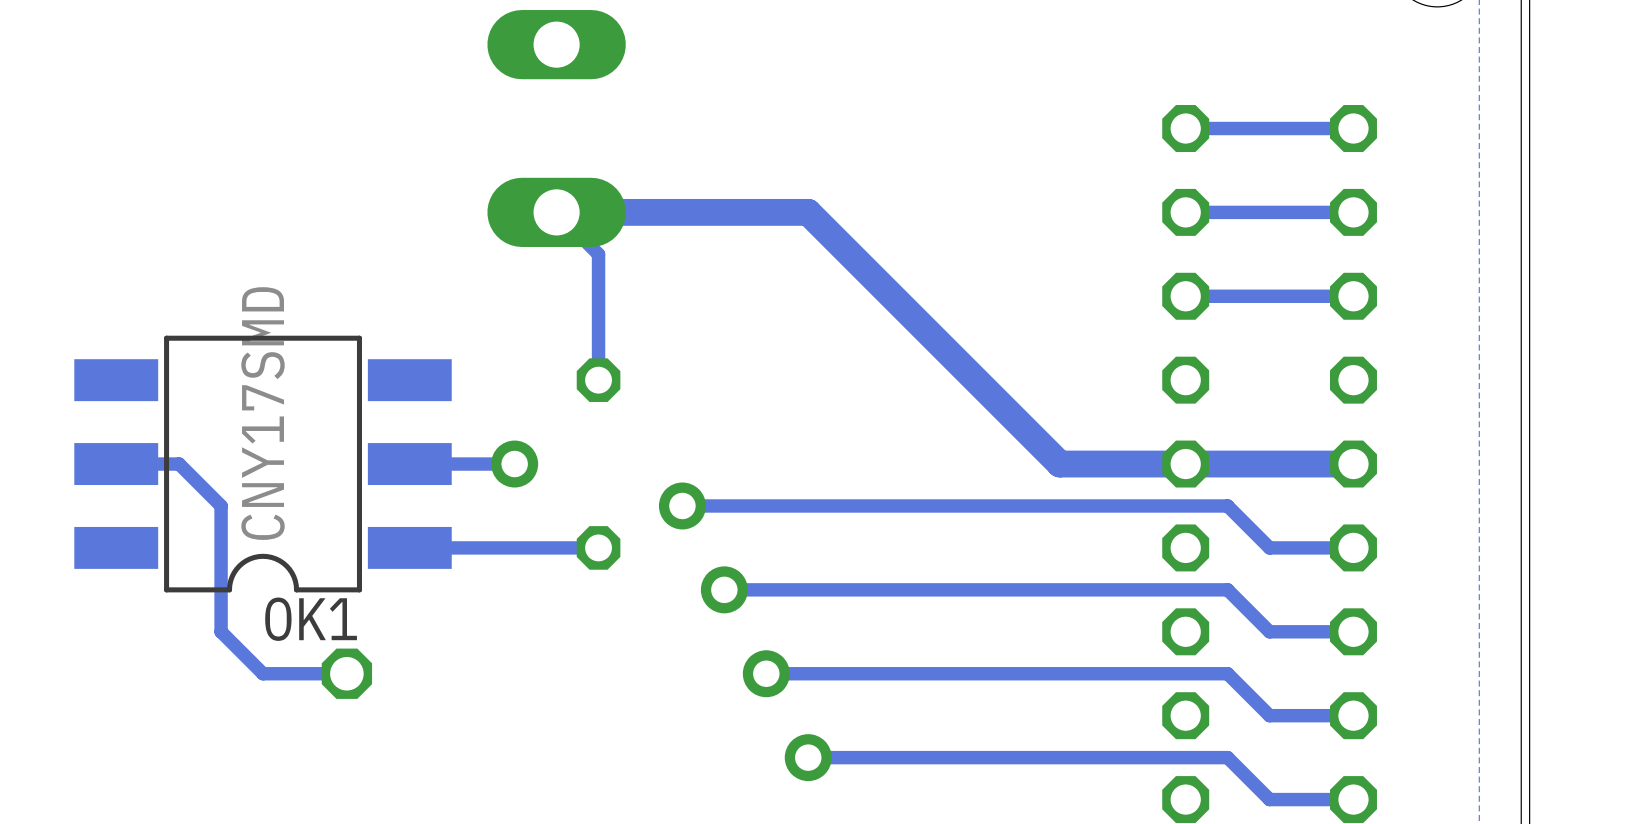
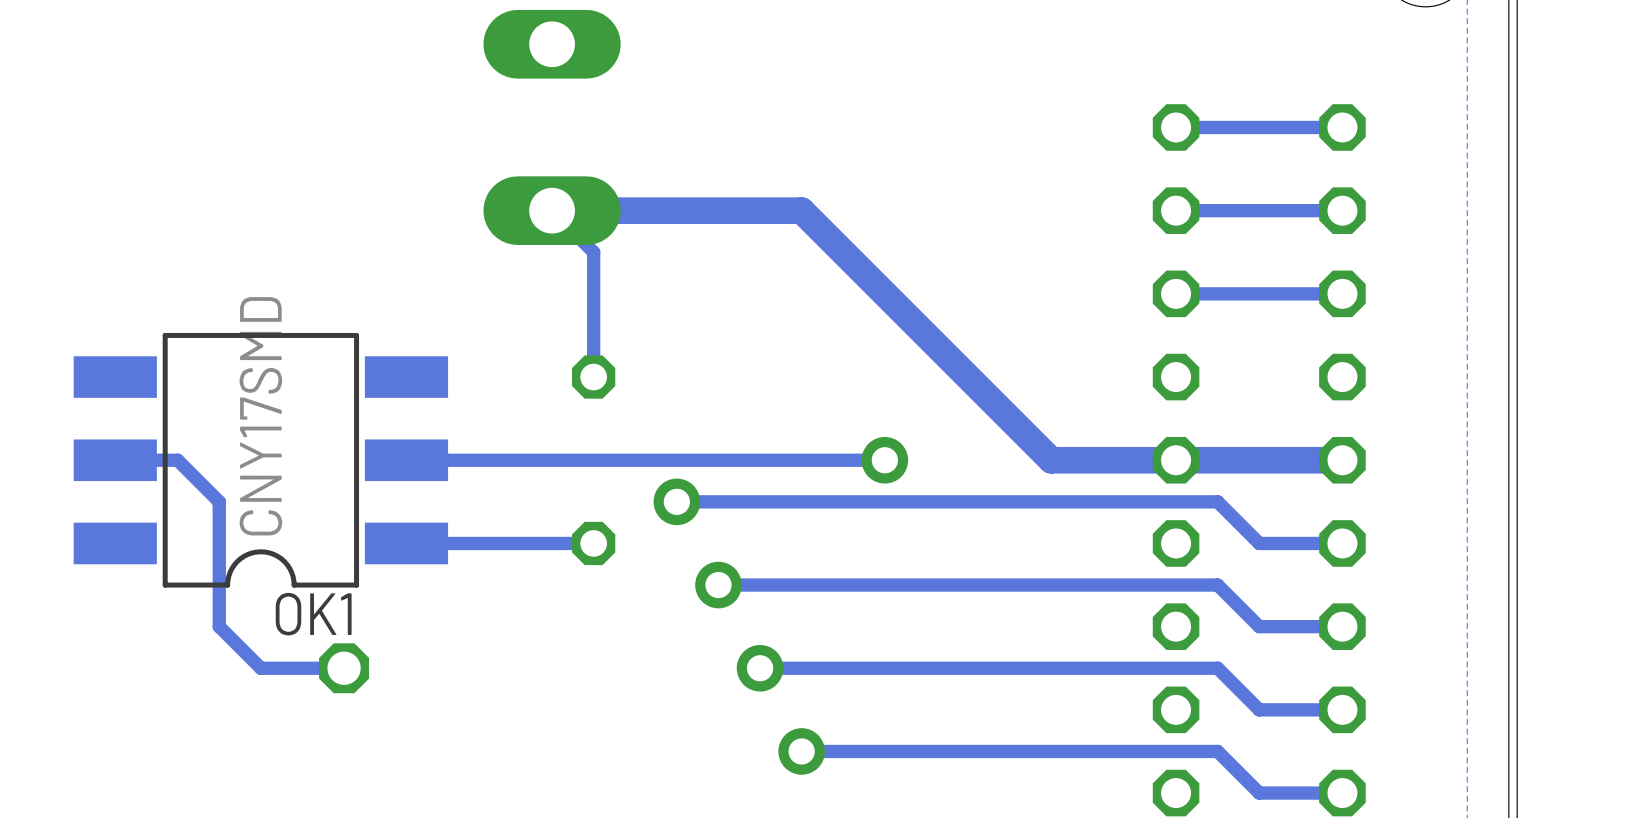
via: (514, 464) -> none
track: none -> (884, 460) (510, 460)
via: none -> (884, 460)

